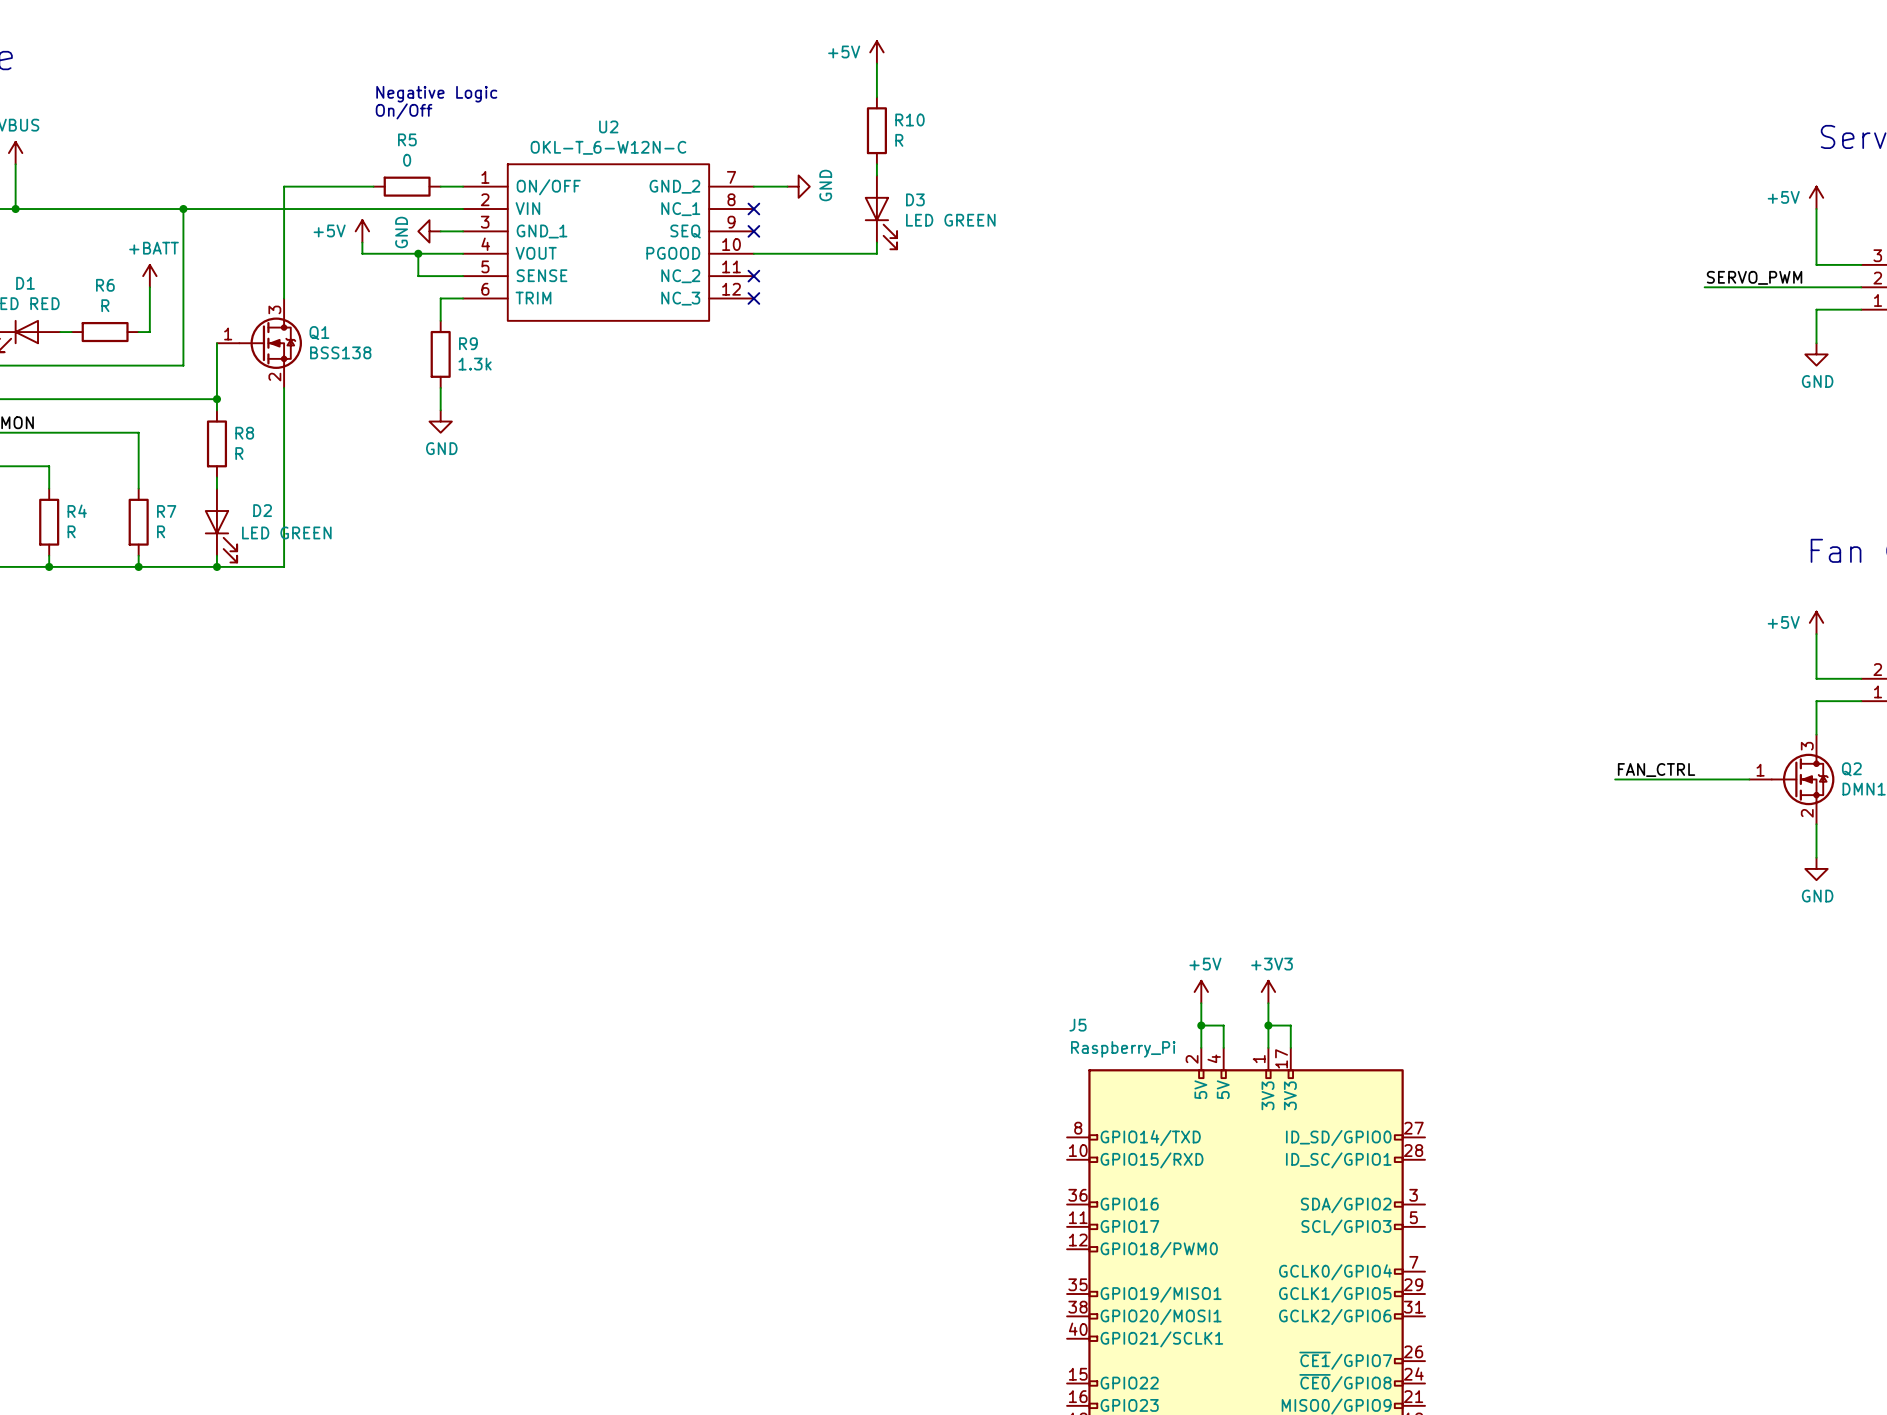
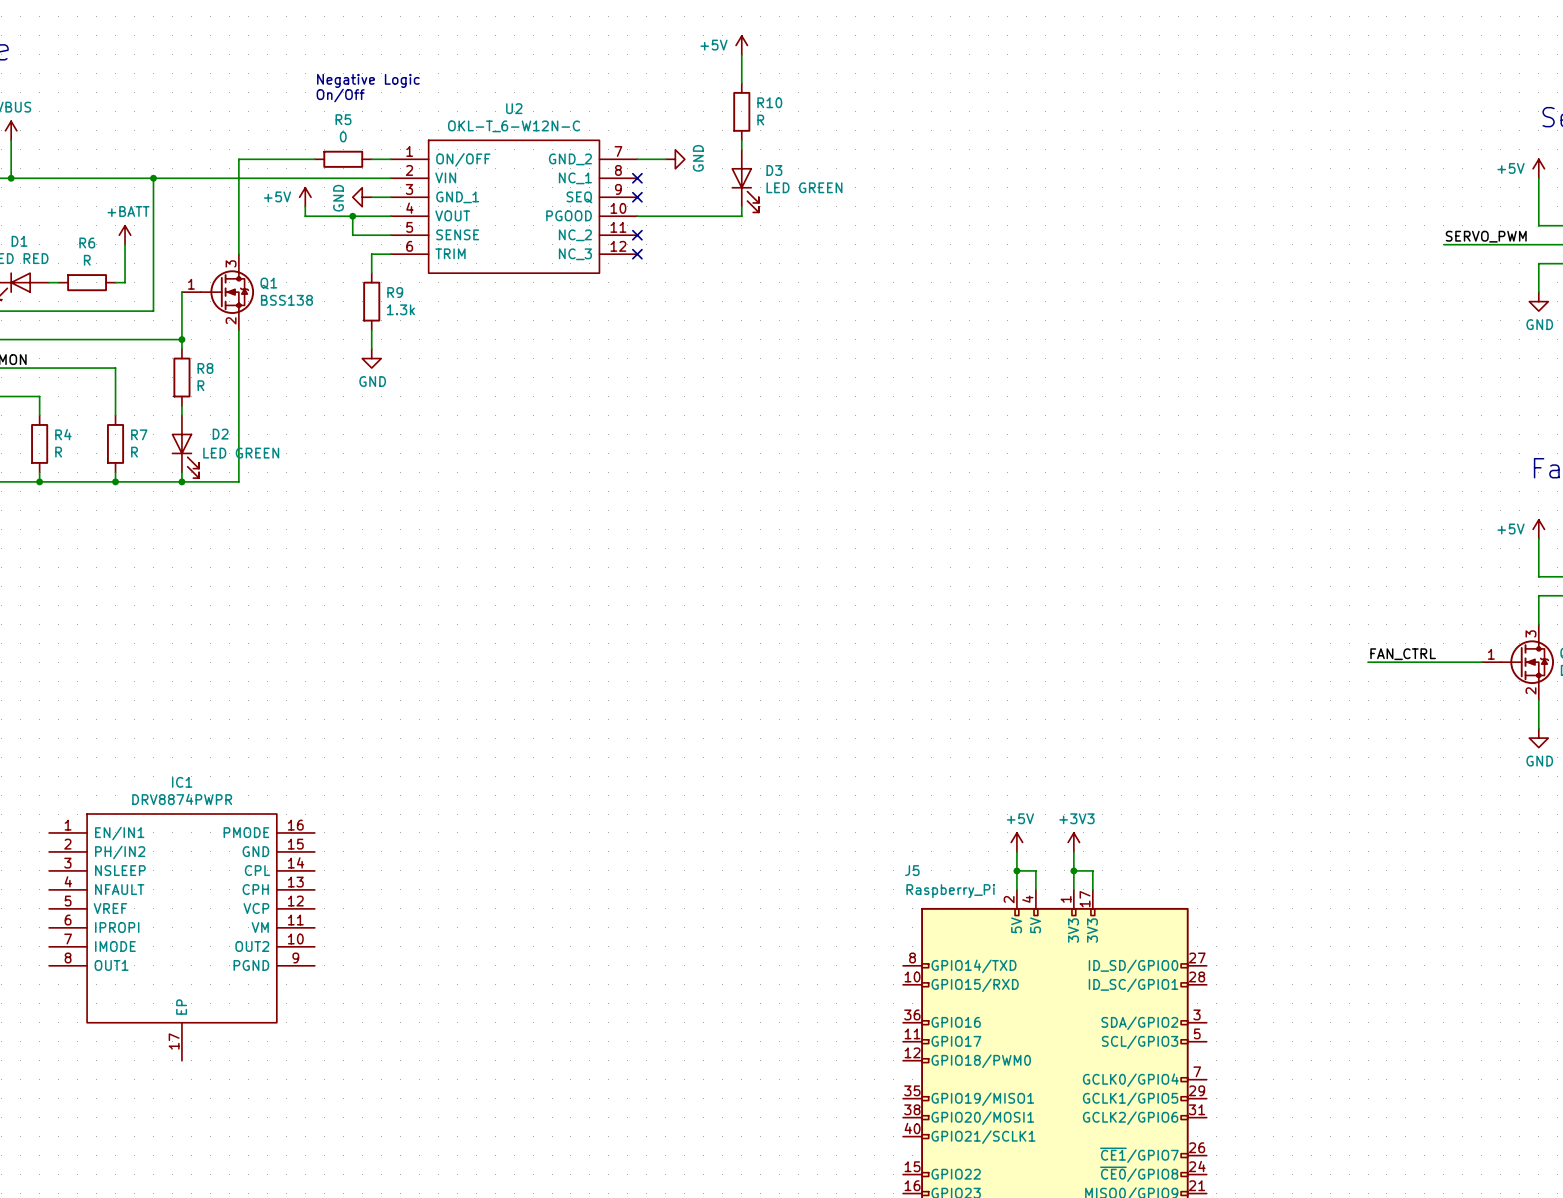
IC1: none -> DRV8874PWPR (181, 937)

